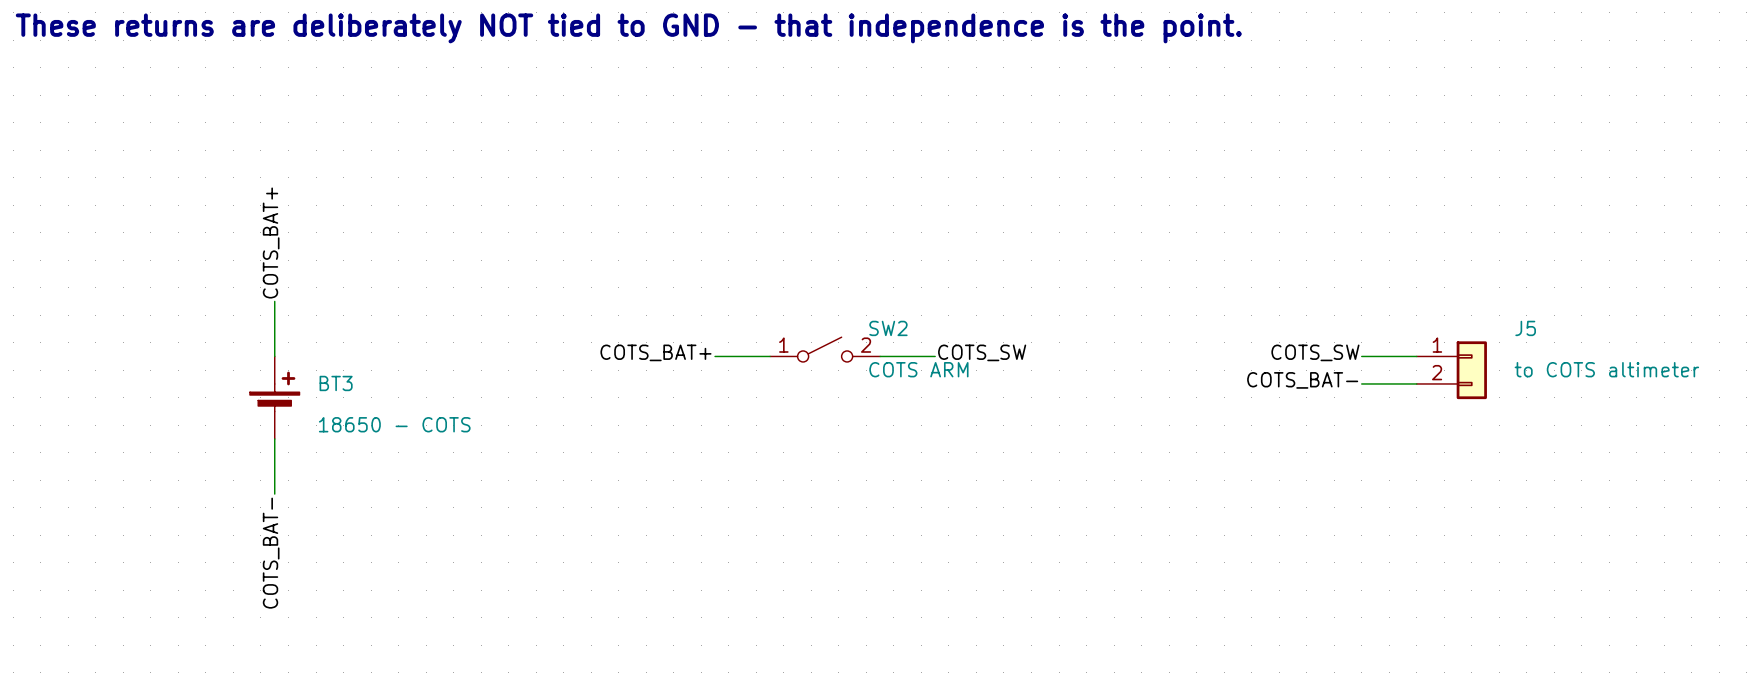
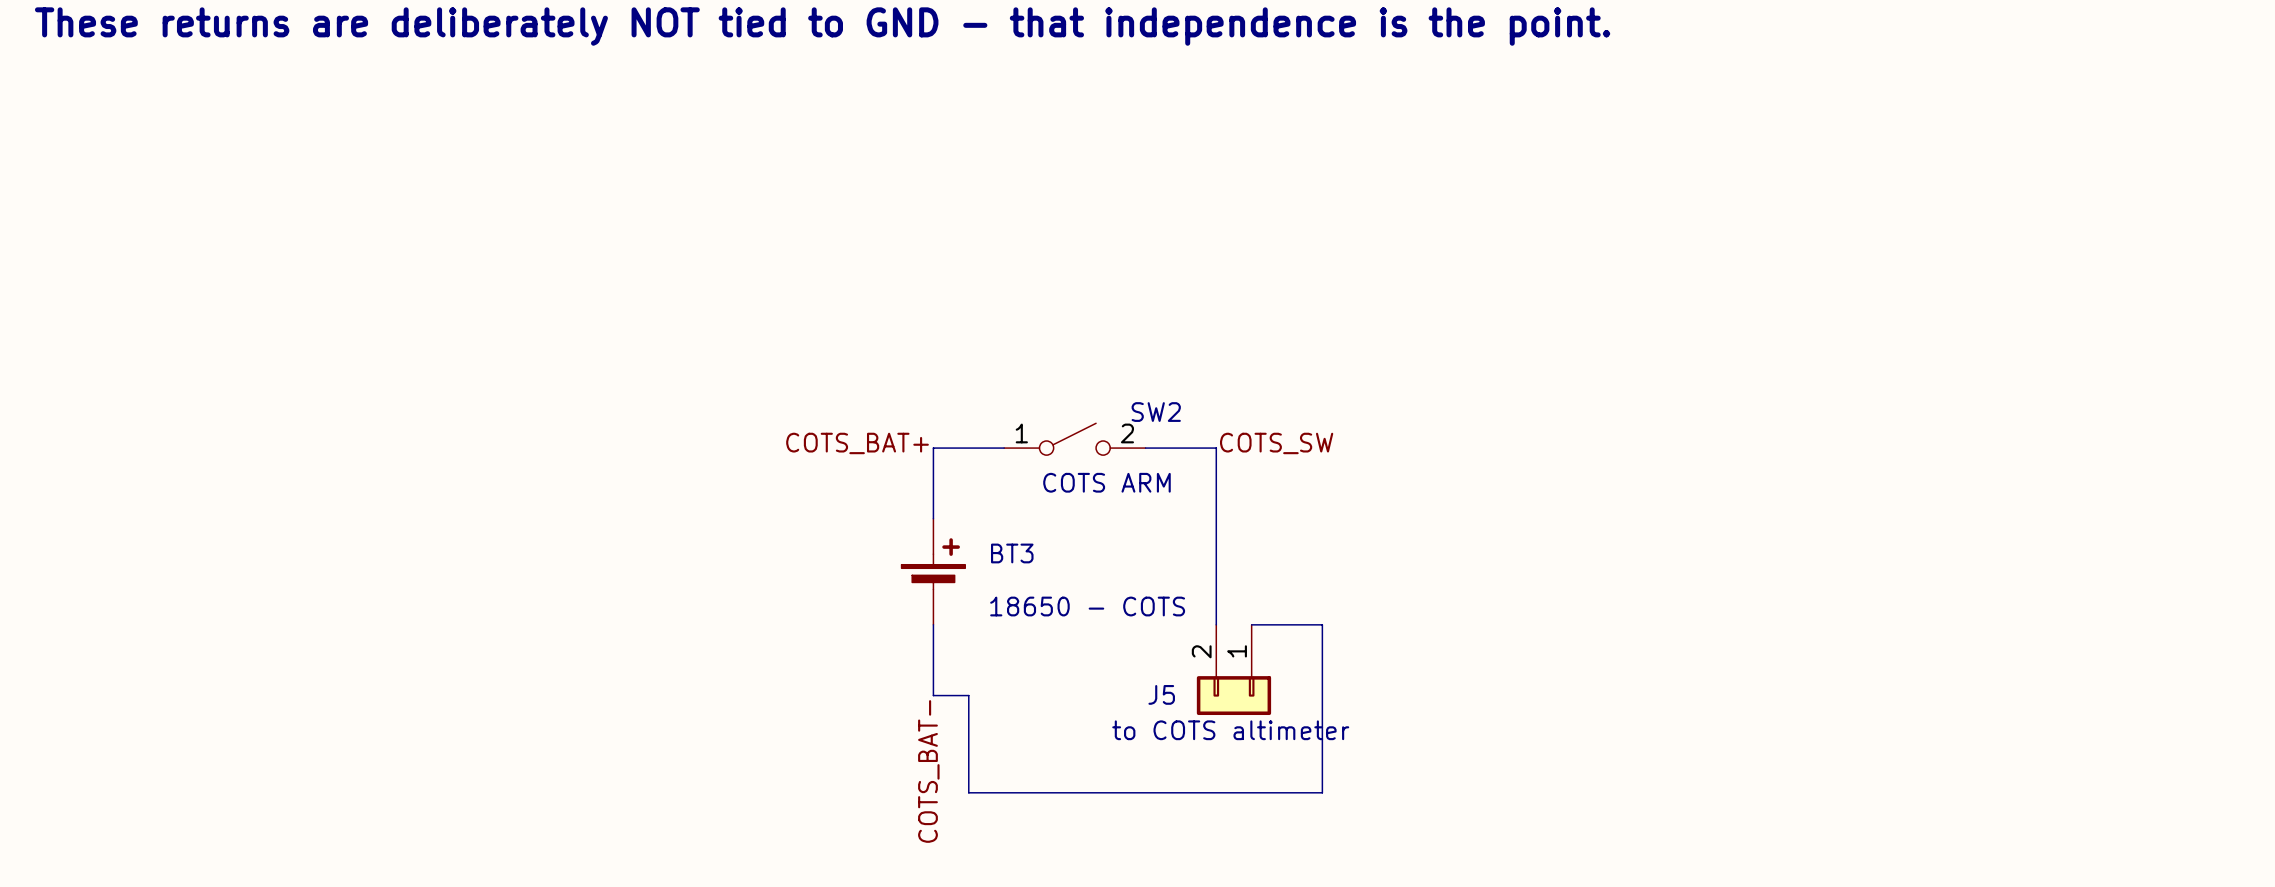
label: COTS_BAT+ (271, 243) -> none
wire: (274, 301) (274, 356) -> none
J5 name position: J5 (1525, 328) -> J5 (1161, 694)
label: COTS_SW (1315, 352) -> none
wire: none -> (933, 448) (933, 518)
wire: none -> (1216, 448) (1216, 624)
wire: (1361, 356) (1416, 356) -> none
SW2 value position: COTS ARM (918, 369) -> COTS ARM (1106, 482)
J5 value position: to COTS altimeter (1606, 369) -> to COTS altimeter (1230, 730)
J5 position: (1451, 370) -> (1233, 669)
J5 rotation: 0° (1471, 370) -> 90° clockwise (1233, 695)
label: COTS_BAT- (1302, 380) -> none
wire: (1361, 383) (1416, 383) -> none
BT3 position: (274, 397) -> (933, 571)
wire: (274, 439) (274, 494) -> none
wire: none -> (933, 624) (933, 695) (968, 695) (968, 792) (1322, 792) (1322, 624) (1251, 624)
label: COTS_BAT- (271, 553) -> none
label: none -> COTS_BAT- (928, 771)

